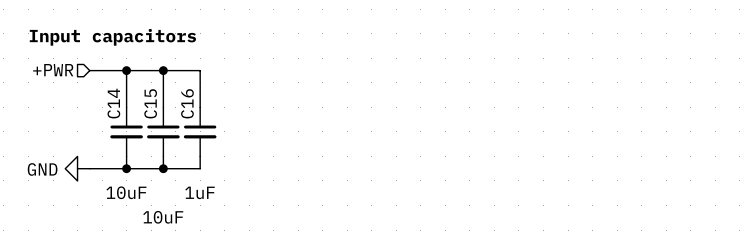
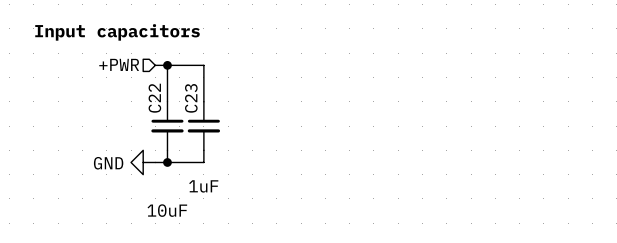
hierarchical label position: +PWR (53, 70) -> +PWR (119, 64)
wire: (89, 70) (151, 70) -> none
wire: (126, 70) (126, 107) -> none
junction: (126, 70) -> none
C15 name: C15 (150, 103) -> C22 (154, 98)
C16 name: C16 (187, 103) -> C23 (191, 98)
C14: 10uF (126, 131) -> none
wire: (126, 156) (126, 168) -> none
power symbol position: GND (77, 168) -> GND (143, 162)
wire: (89, 168) (151, 168) -> none
junction: (126, 168) -> none

